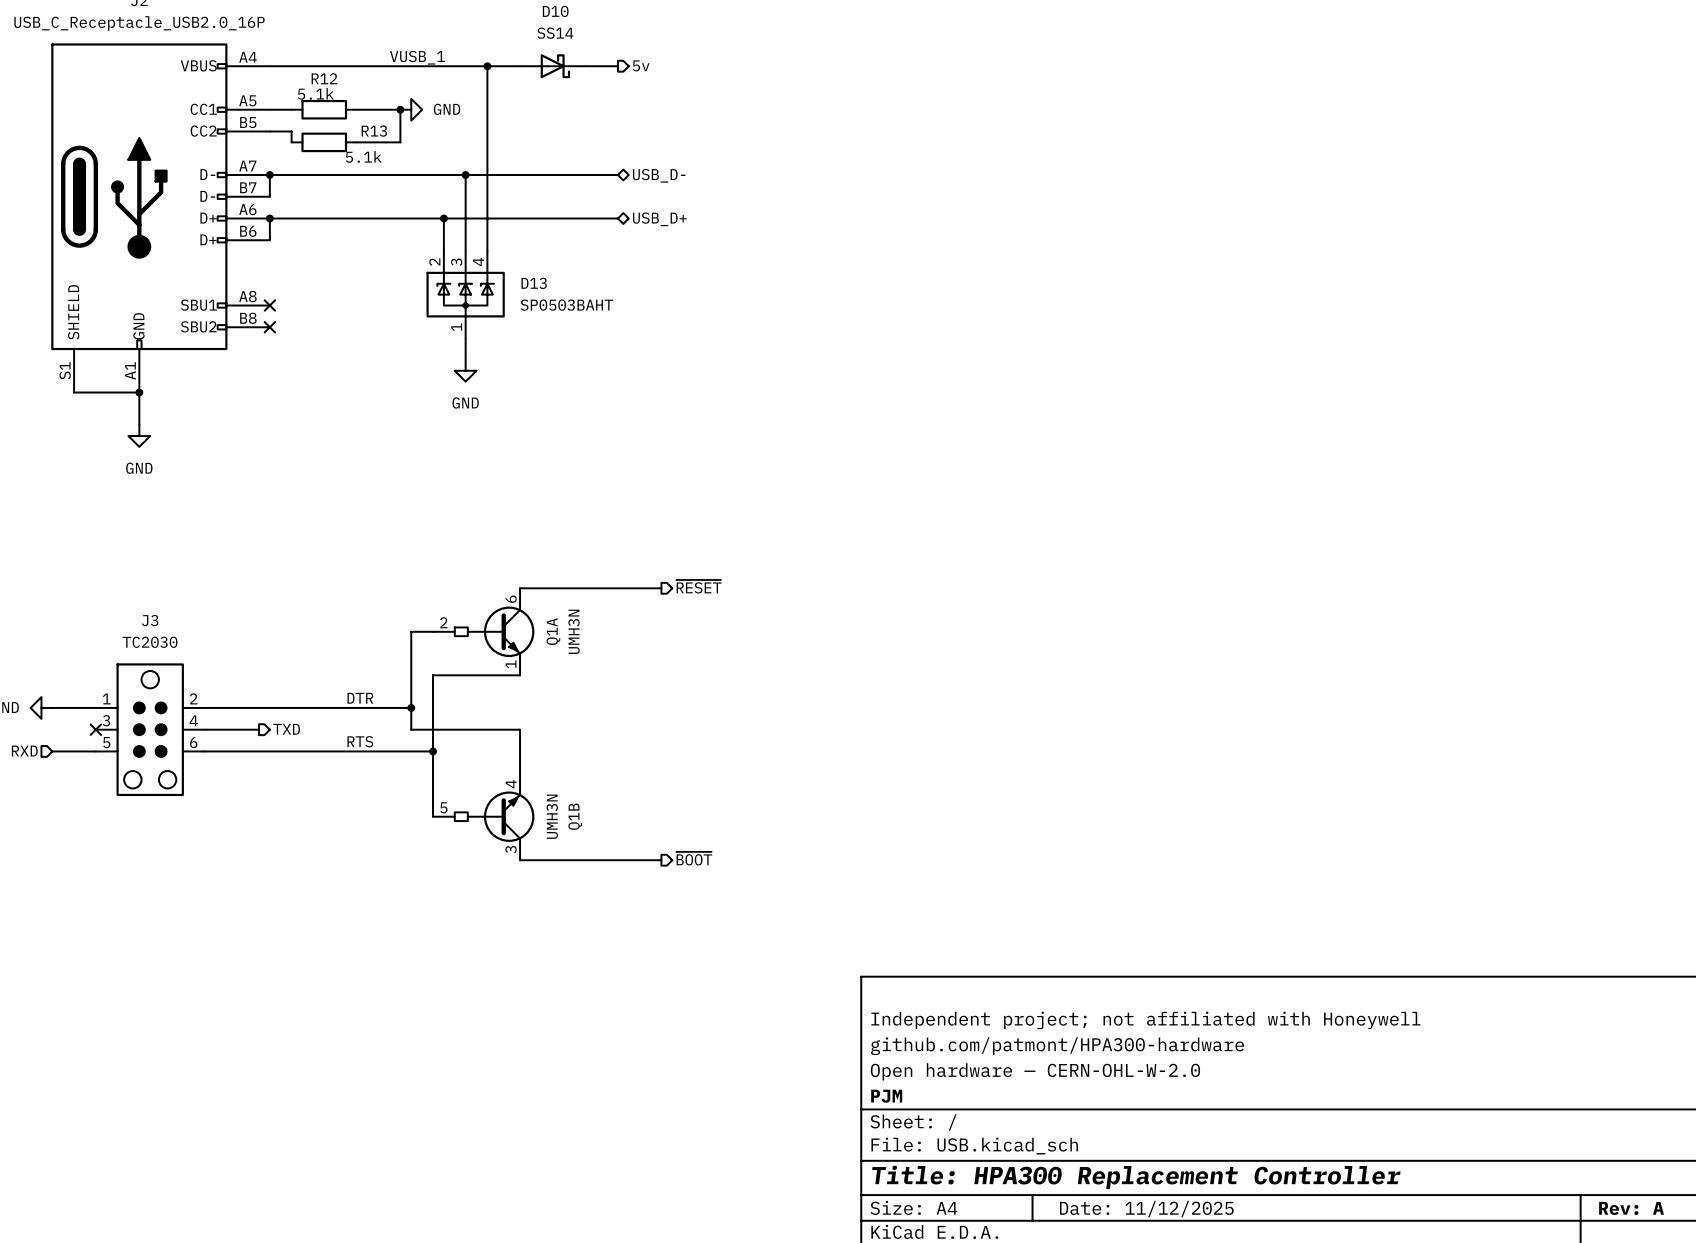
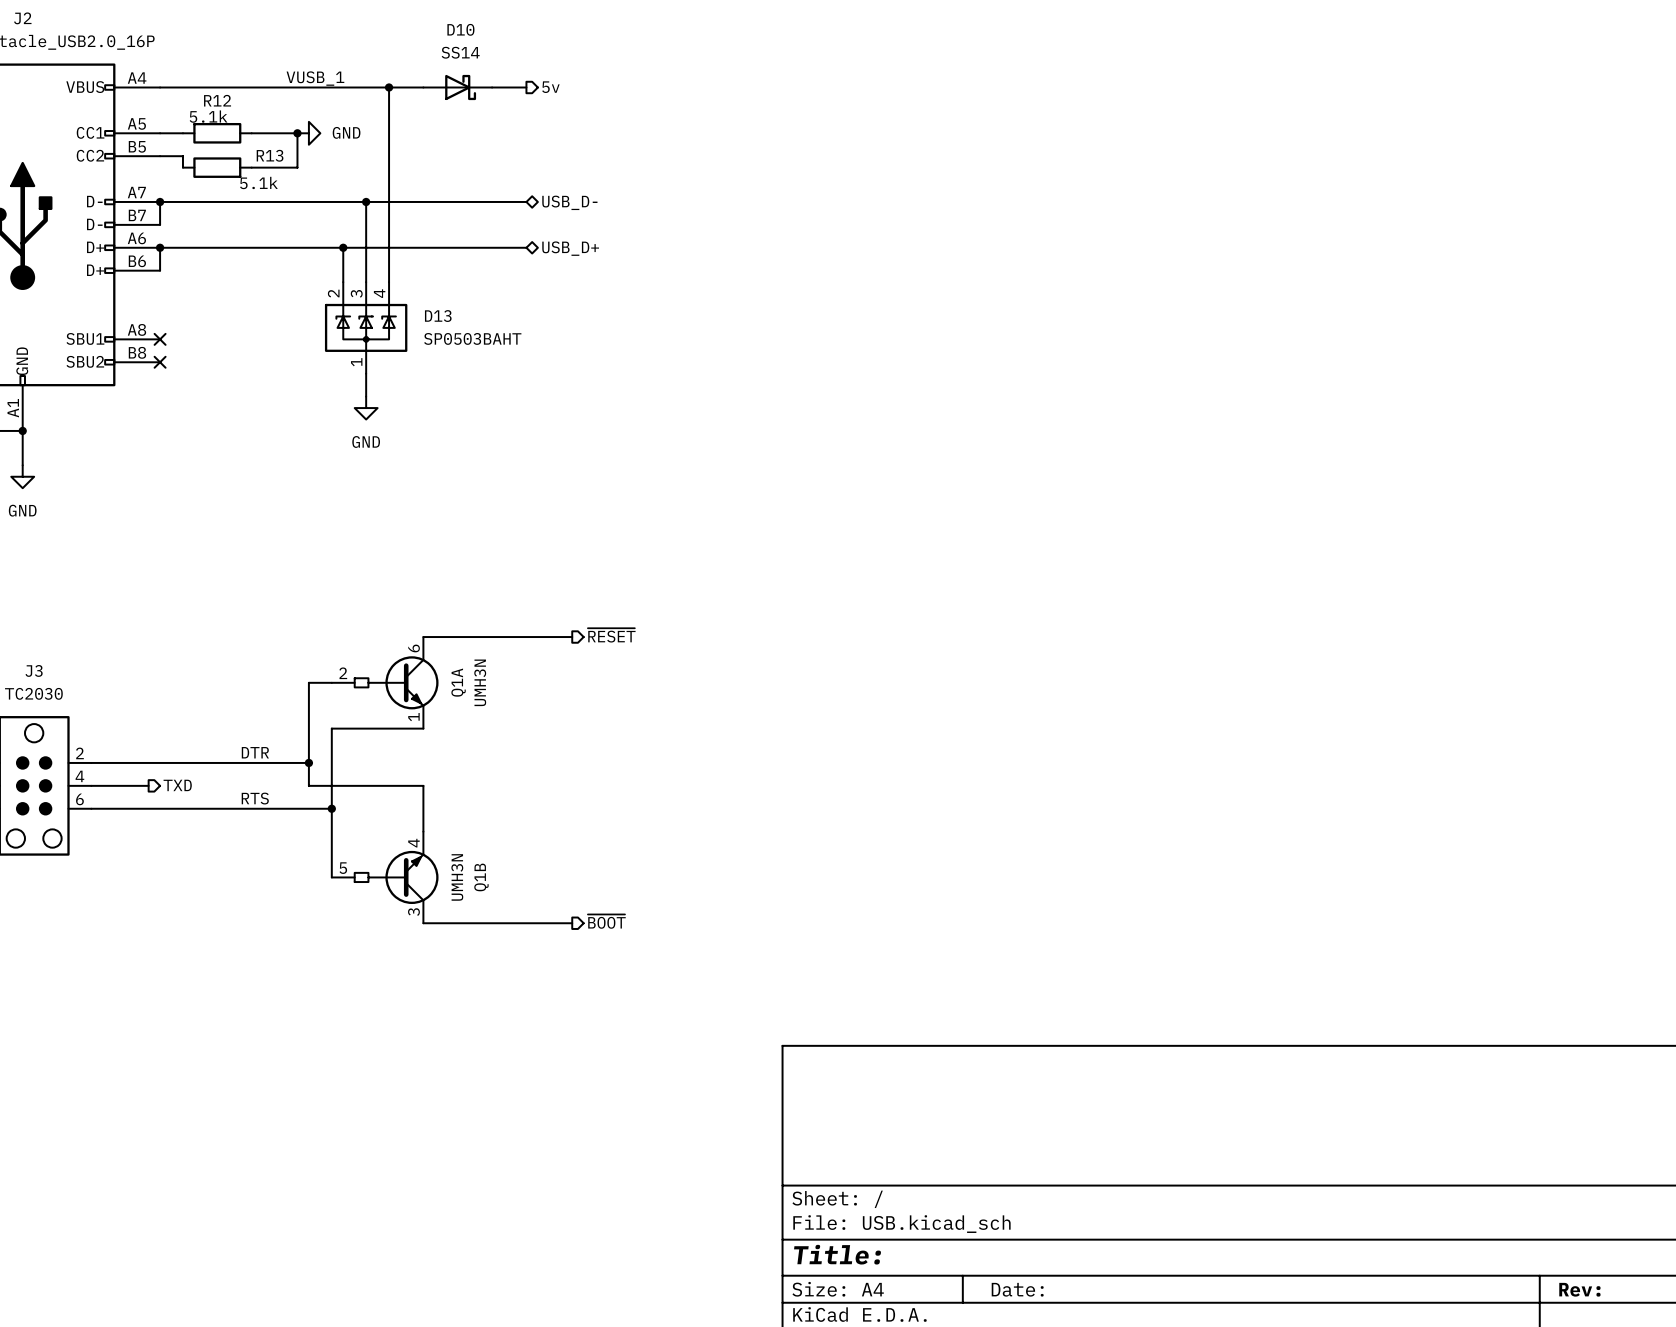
title block: Independent project; not affiliated with Honeywell (1145, 1020) -> none
title block: github.com/patmont/HPA300-hardware (1057, 1046) -> none
title block: Open hardware — CERN-OHL-W-2.0 (1035, 1071) -> none
title block: PJM (886, 1096) -> none
title block: Title: HPA300 Replacement Controller (1136, 1177) -> Title: (837, 1254)
title block: Rev: A (1631, 1208) -> Rev: (1579, 1289)
title block: Date: 11/12/2025 (1146, 1209) -> Date: (1017, 1289)

